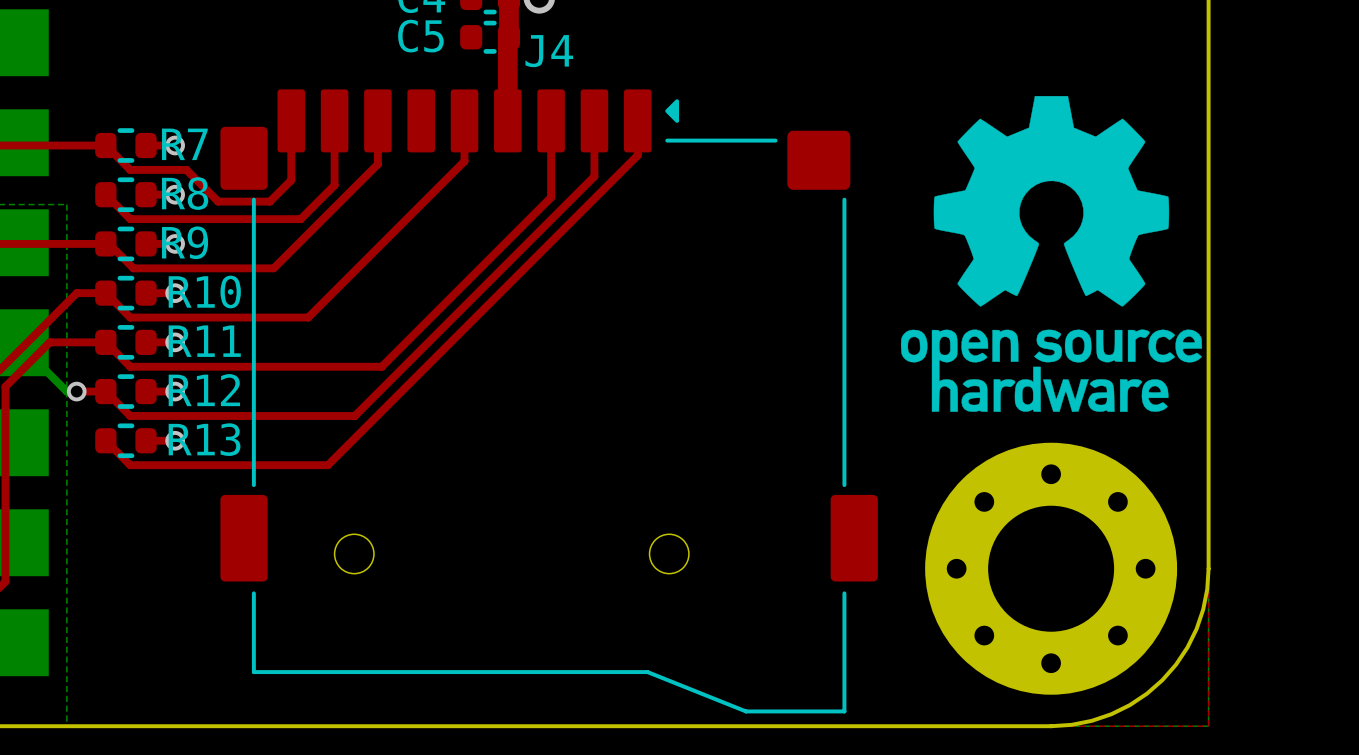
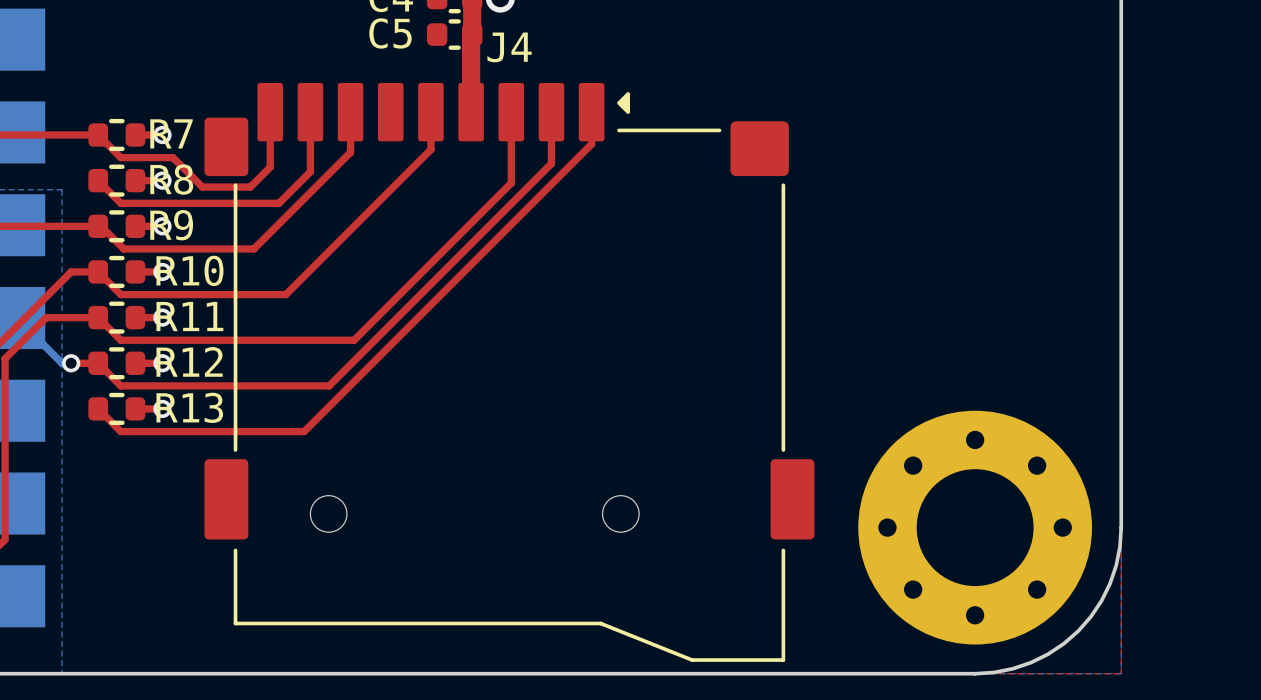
drawing: [900, 96, 1203, 412] -> none

